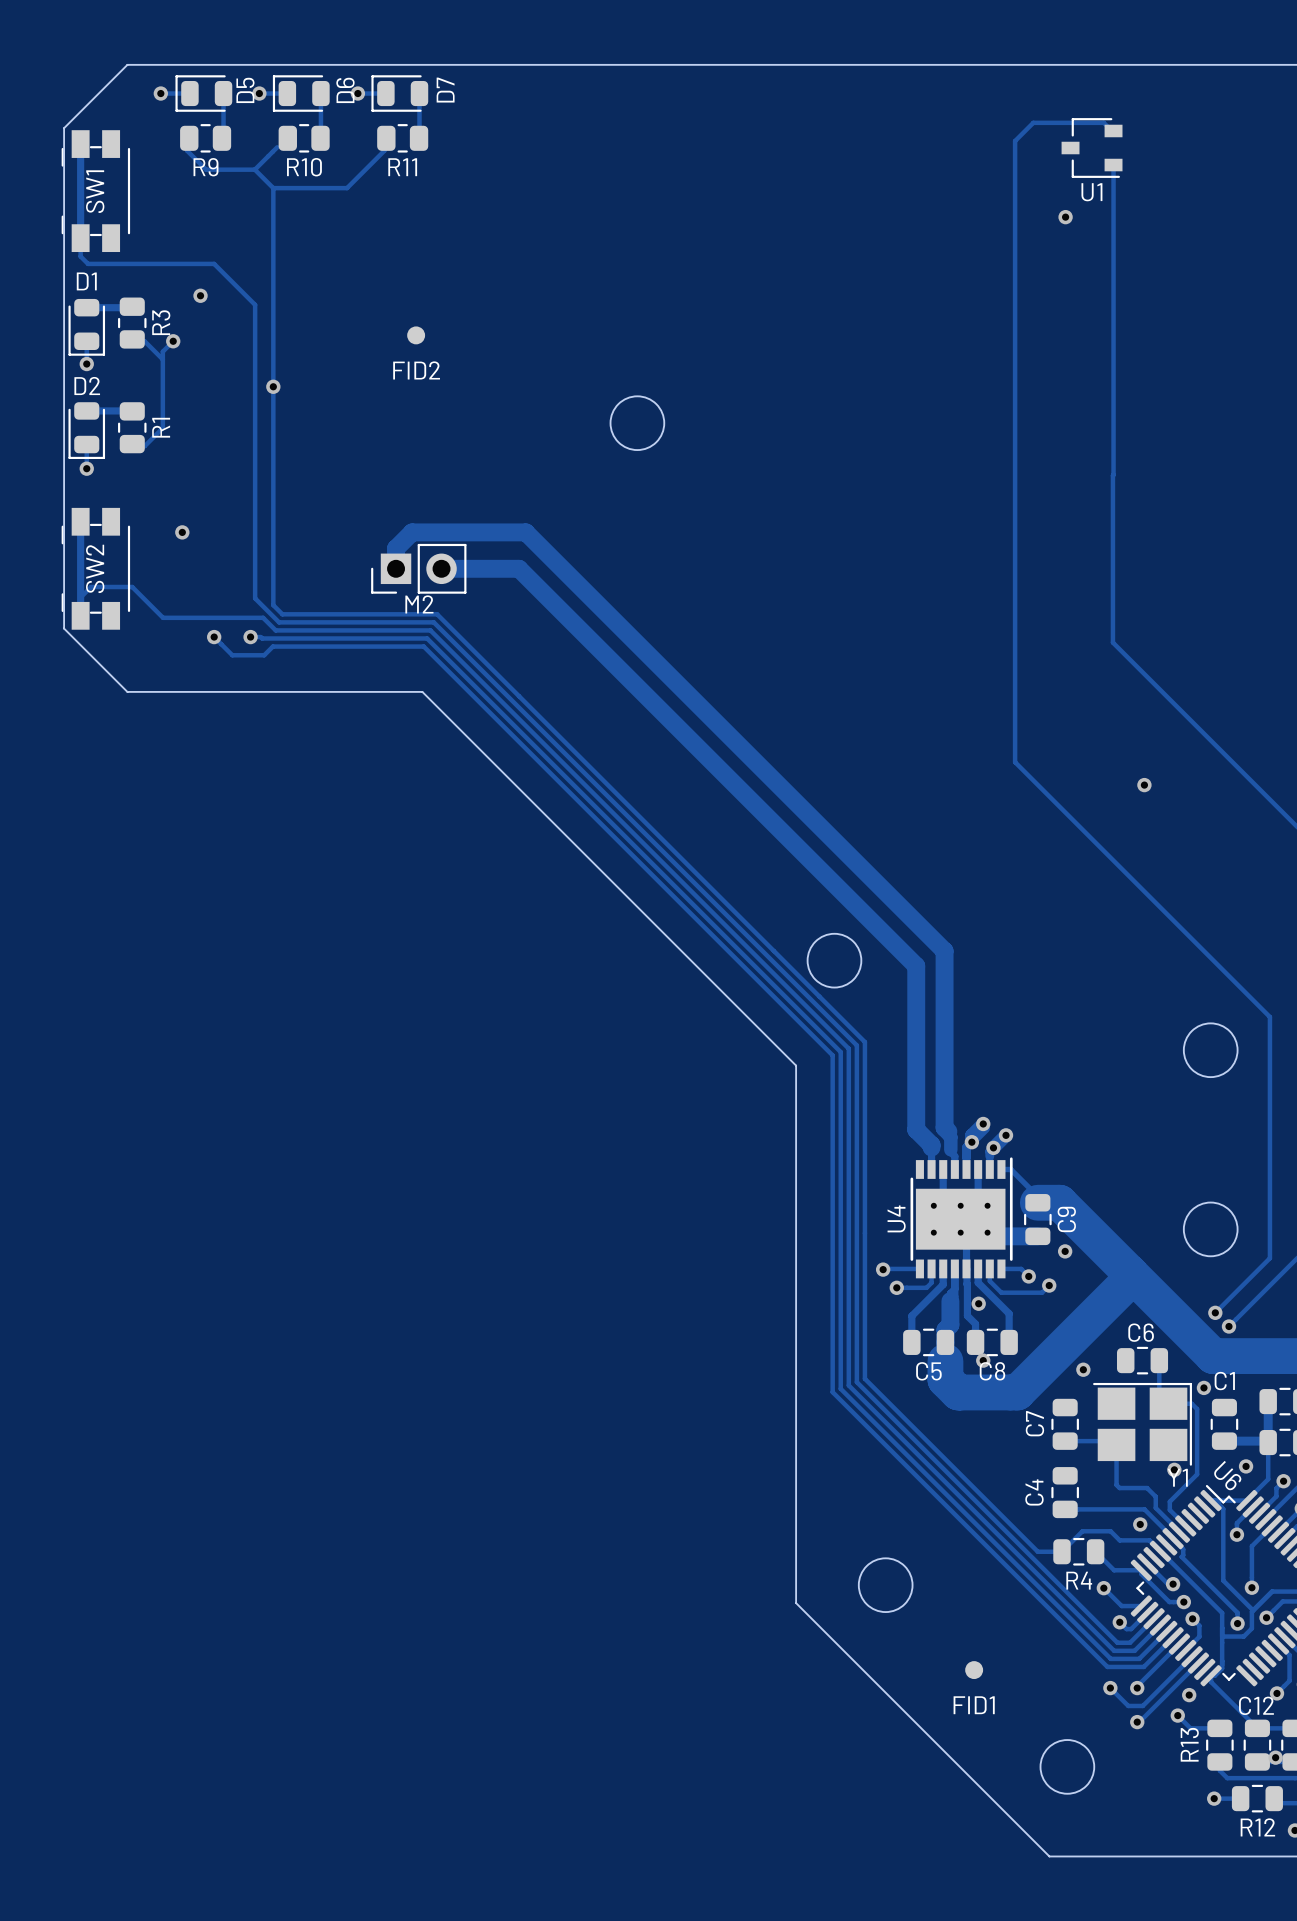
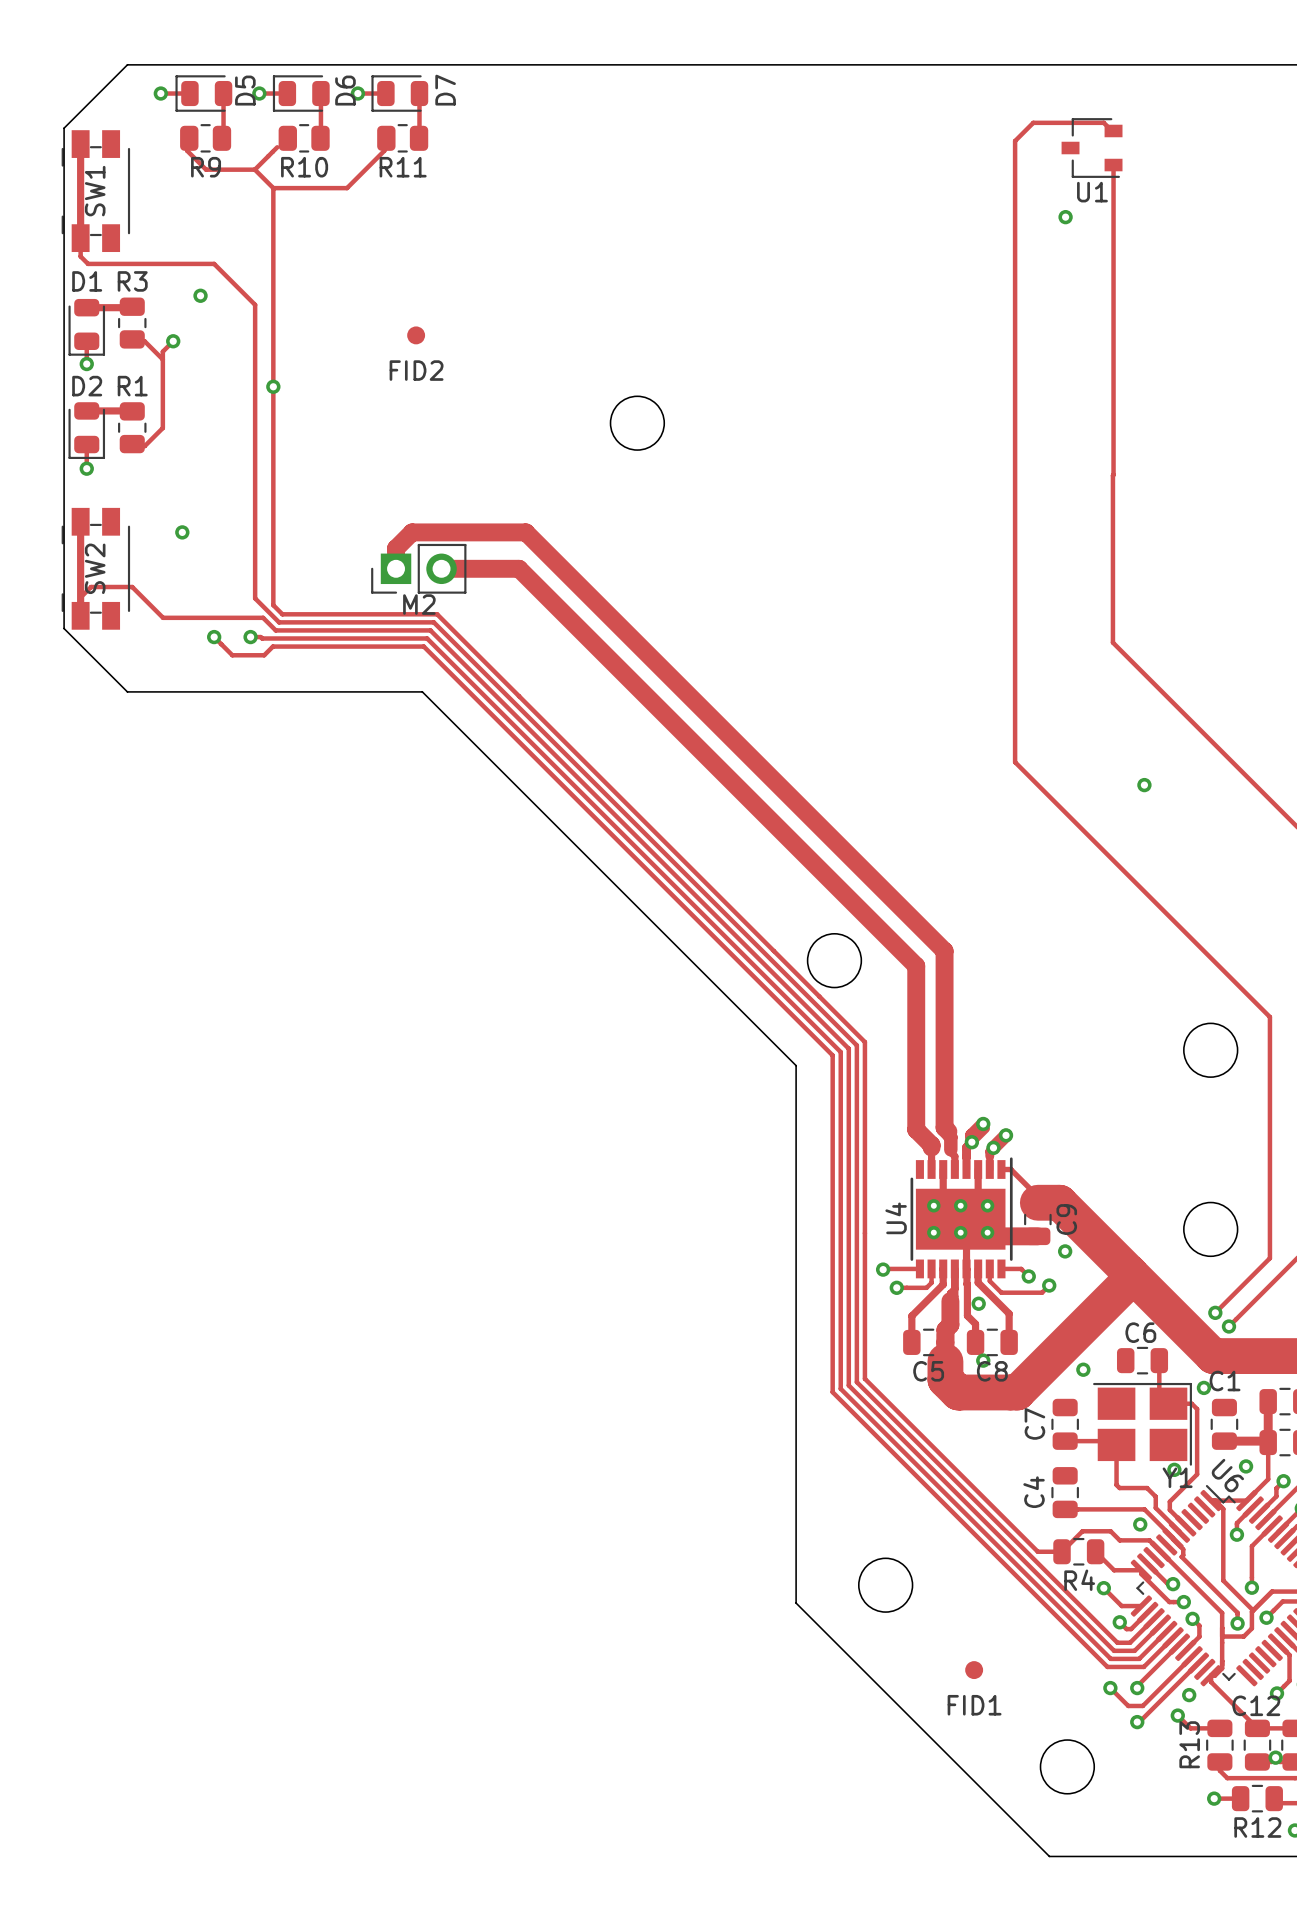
R3 name rotation: 0° (161, 322) -> 90° clockwise (132, 281)
R3 name position: R3 (161, 322) -> R3 (132, 281)
R1 name rotation: 0° (161, 427) -> 90° clockwise (132, 386)
R1 name position: R1 (161, 427) -> R1 (132, 386)

